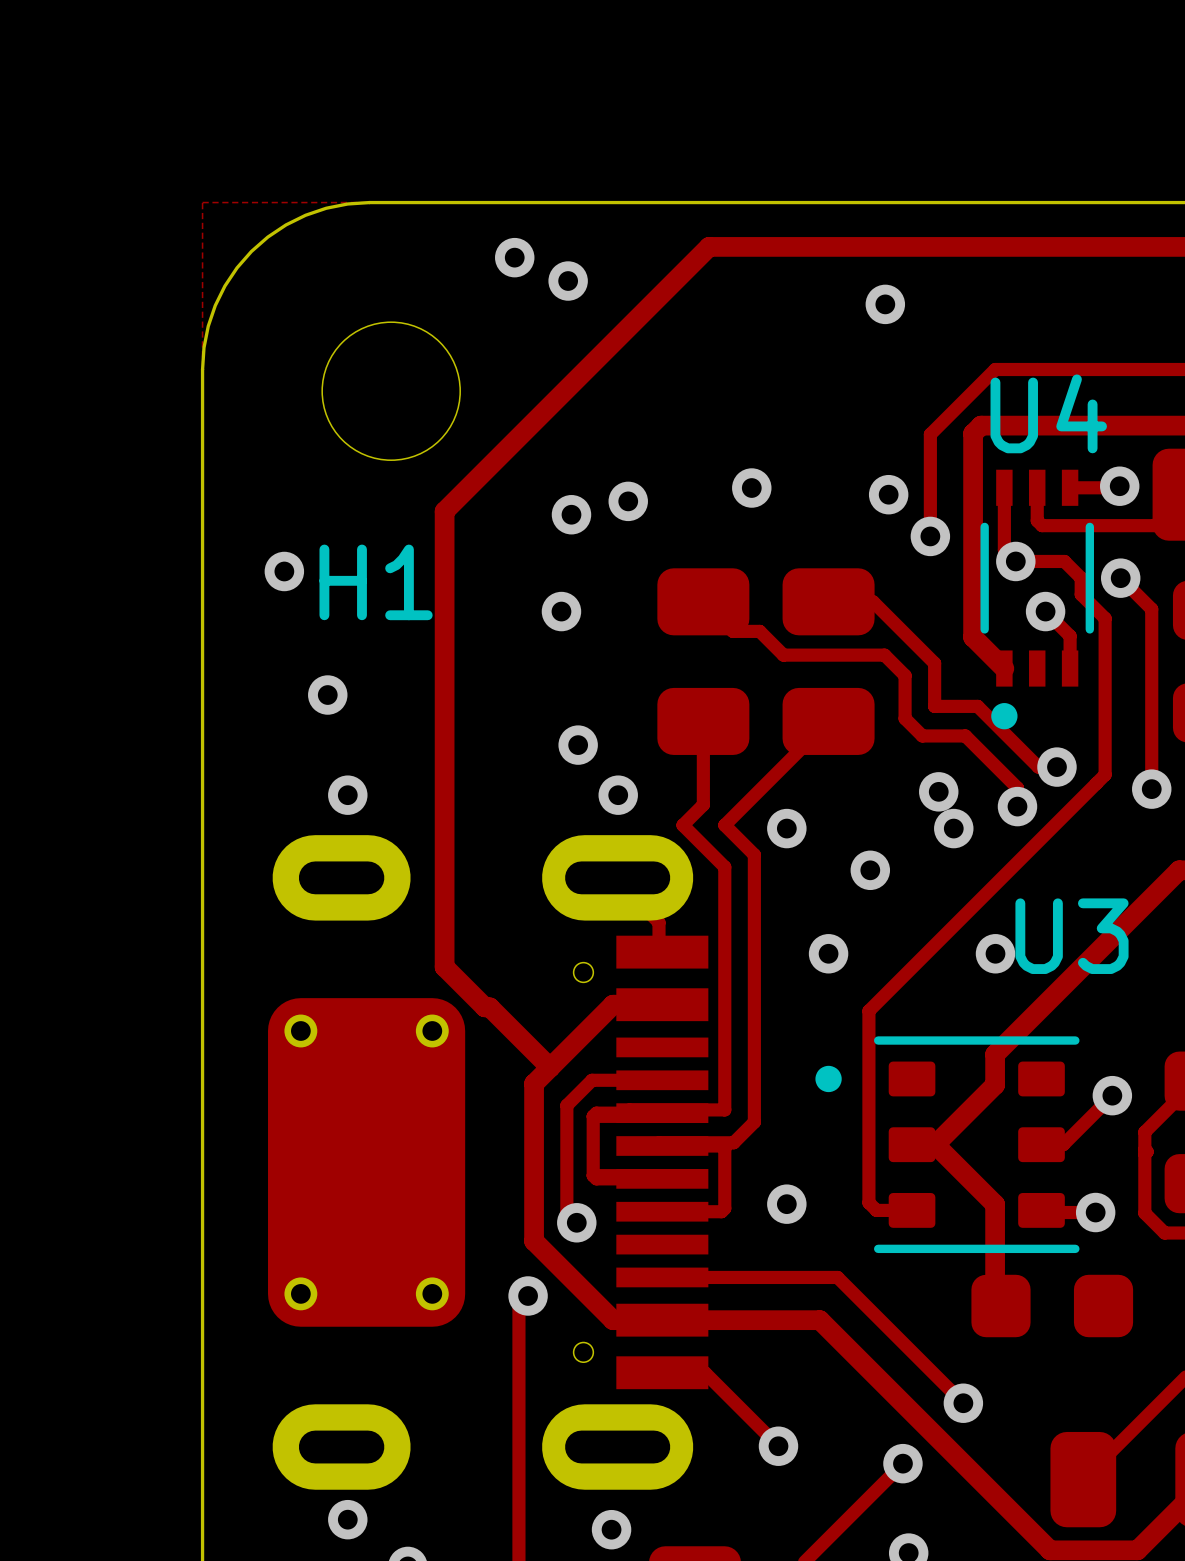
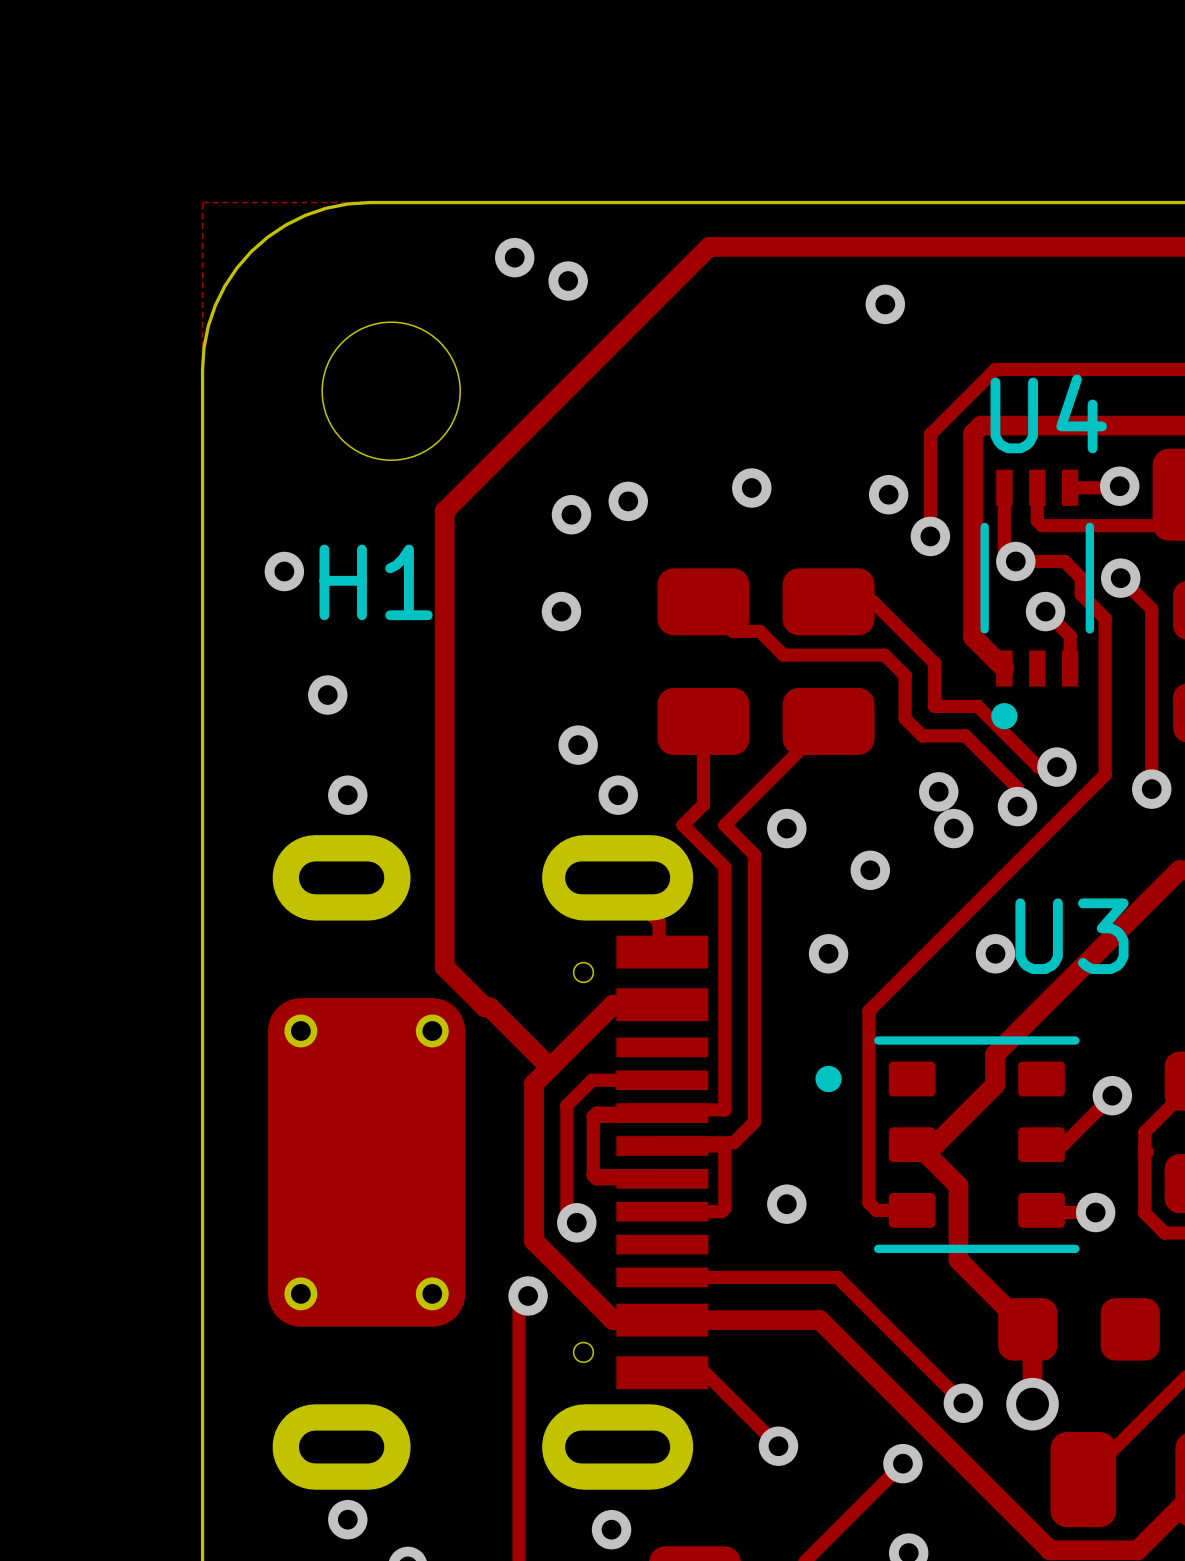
track: none -> (917, 1144) (958, 1185) (958, 1260) (1032, 1334) (1032, 1404)
track: (935, 1144) (995, 1204) (995, 1300) (1000, 1306) -> none
part position: (1052, 1306) -> (1078, 1329)
via: none -> (1032, 1404)

